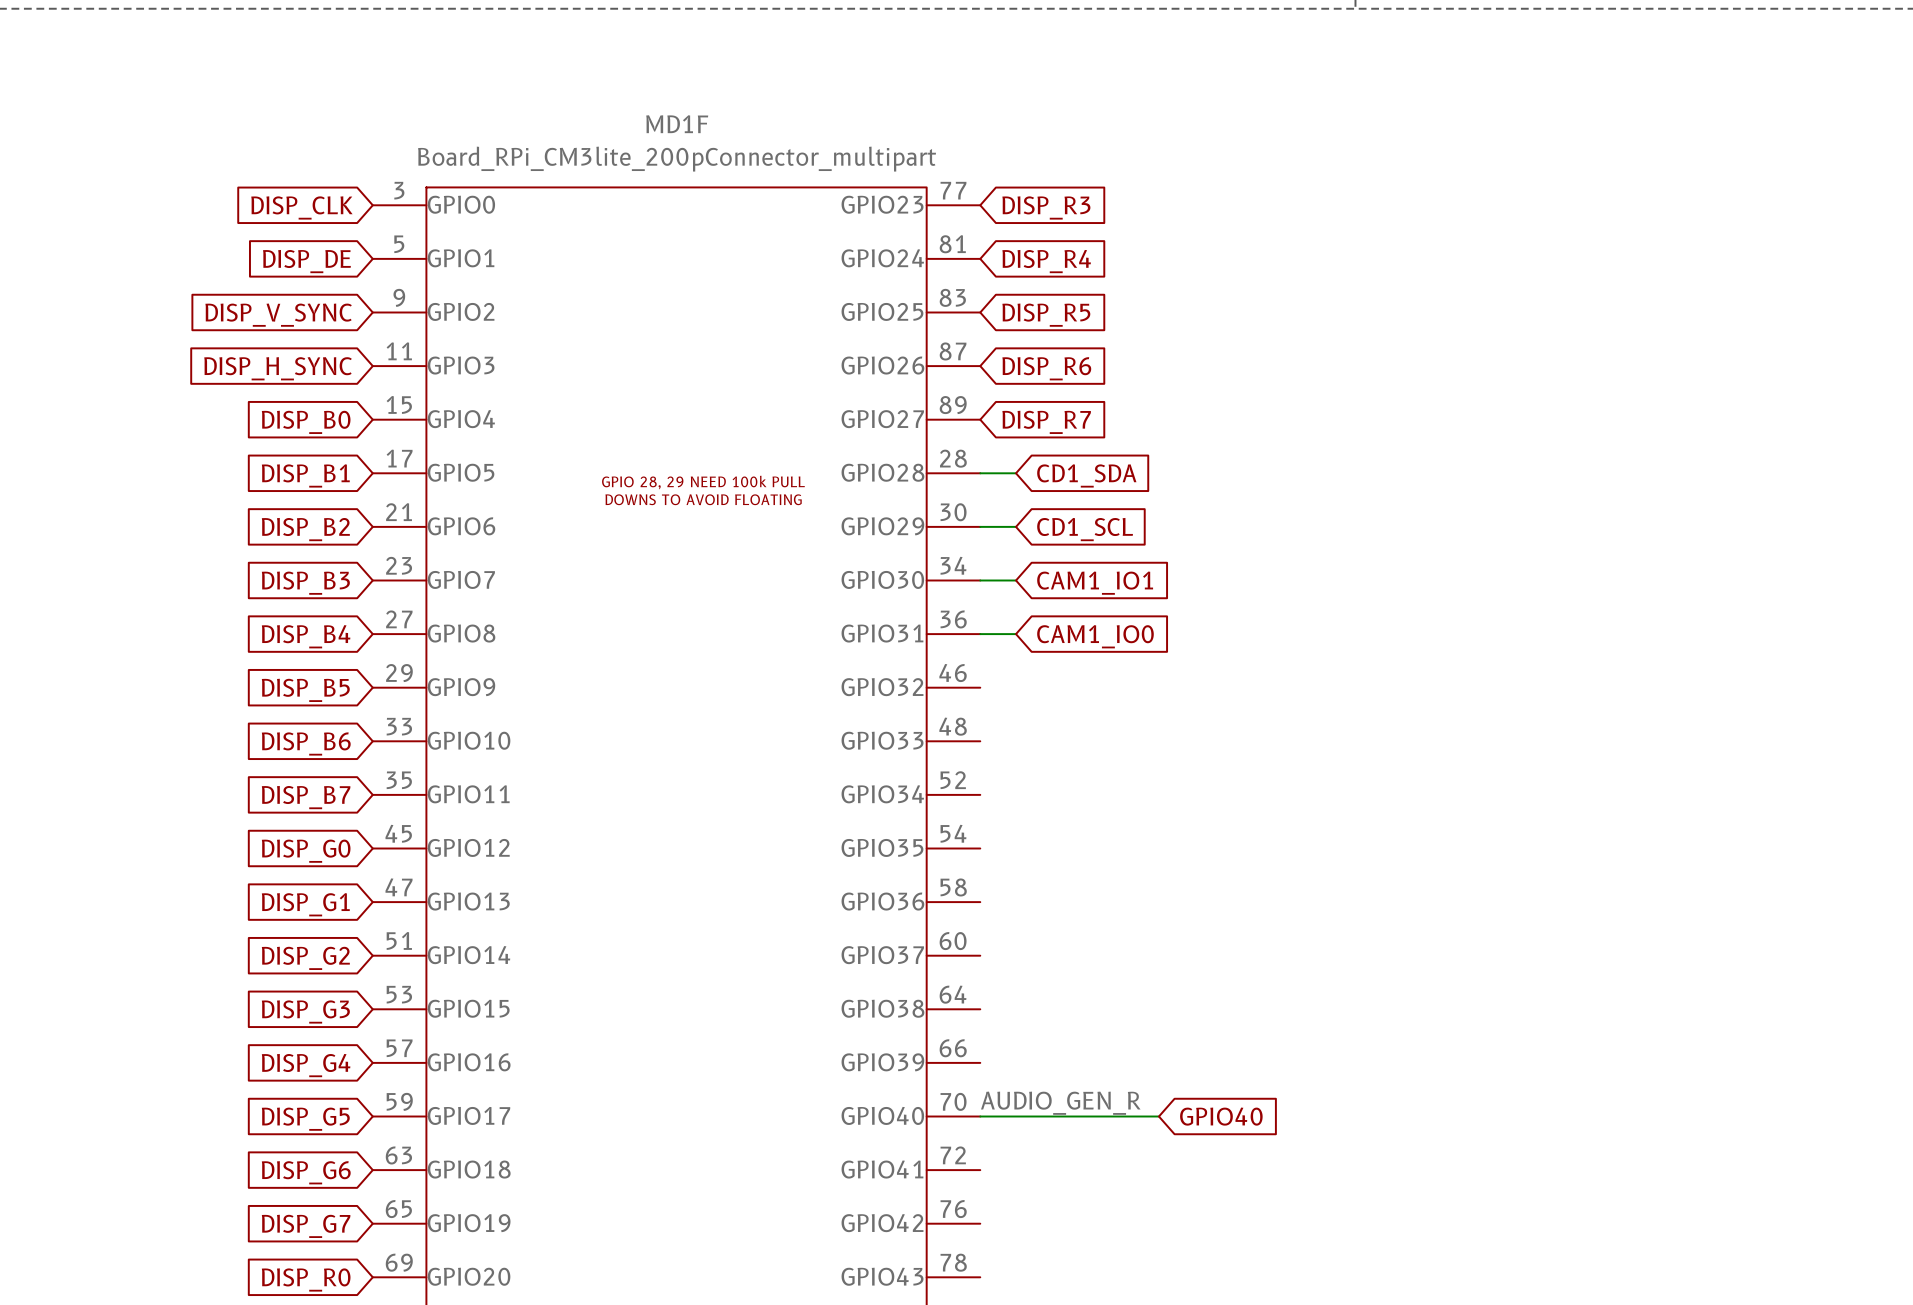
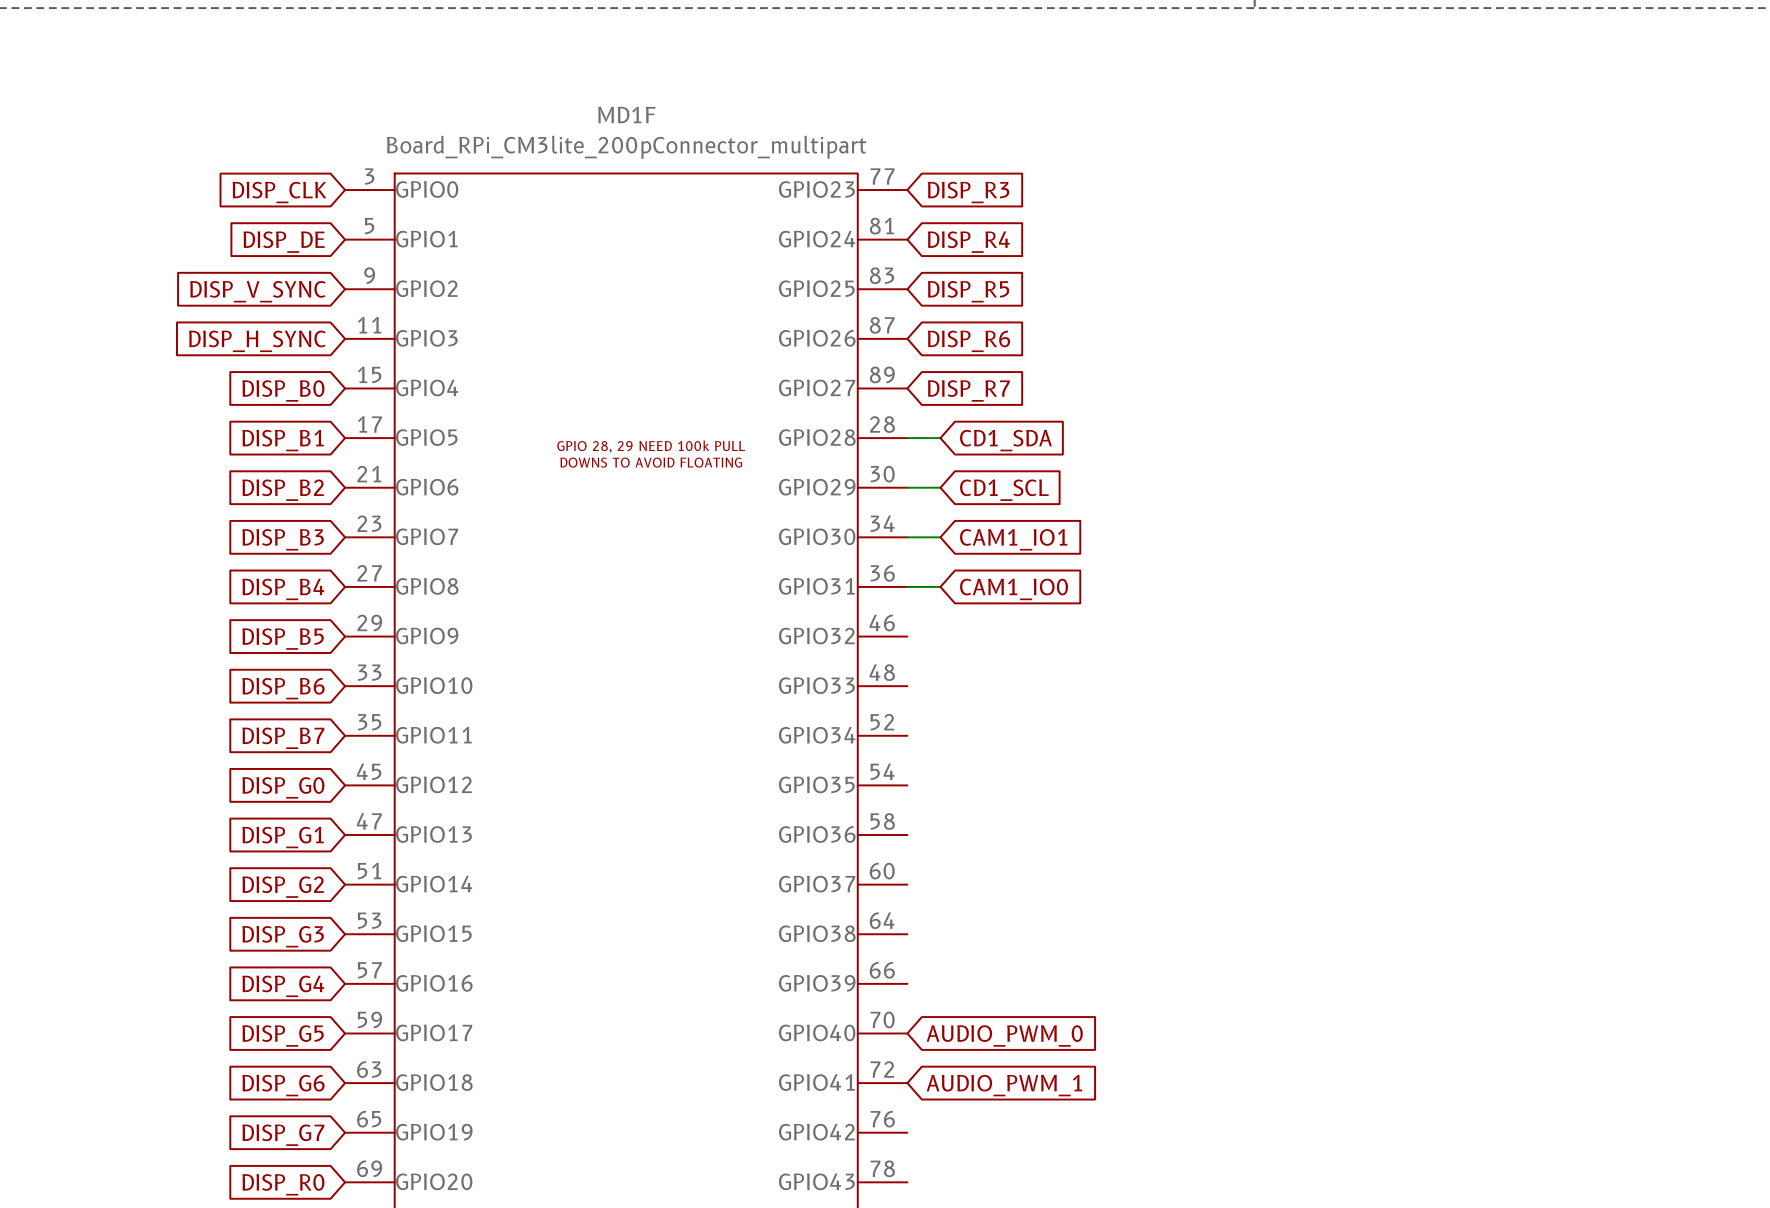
label: AUDIO_GEN_R (1060, 1103) -> none
wire: (980, 1116) (1158, 1116) -> none
global label: GPIO40 (1221, 1116) -> none
global label: none -> AUDIO_PWM_0 (1004, 1035)
global label: none -> AUDIO_PWM_1 (1004, 1085)

